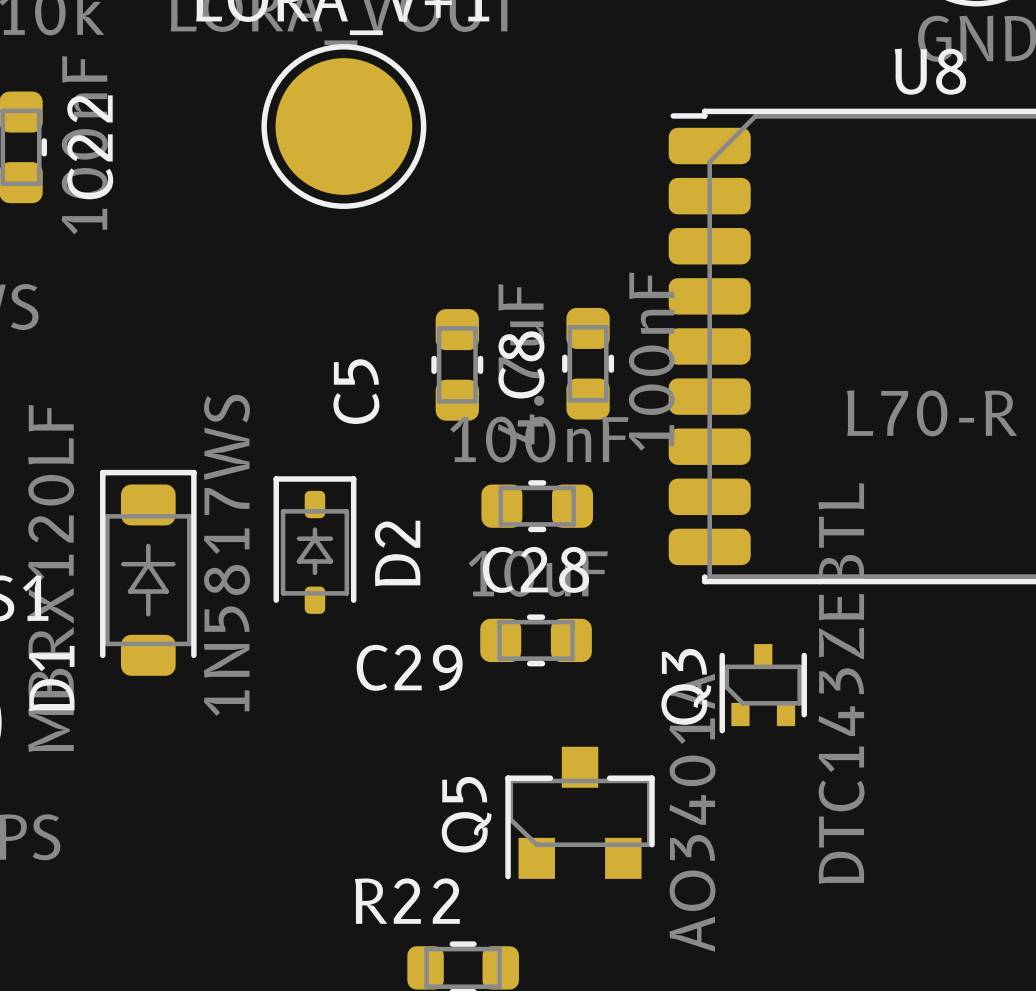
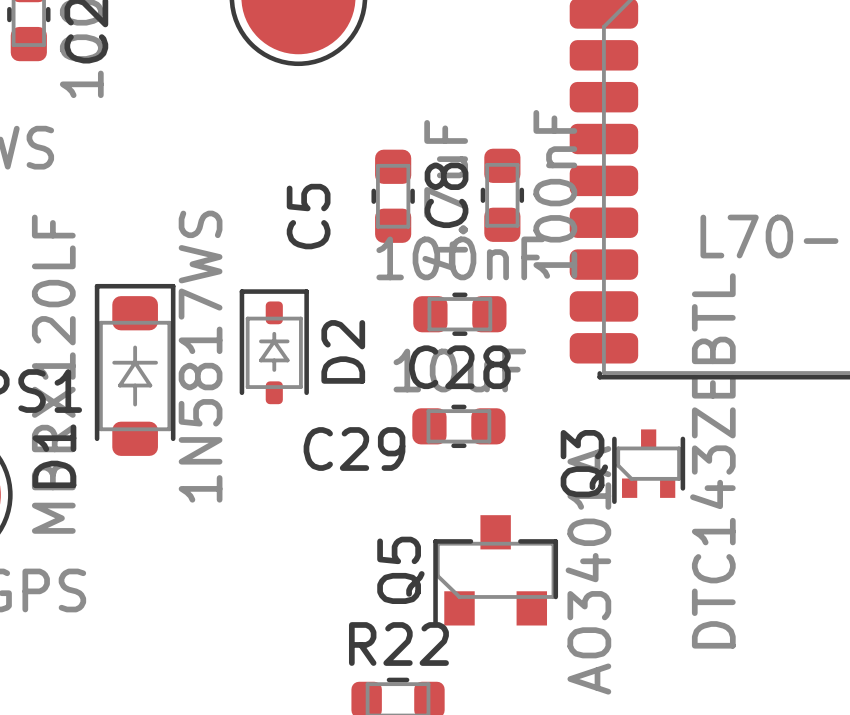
R22 name position: R22 (407, 901) -> R22 (398, 644)

